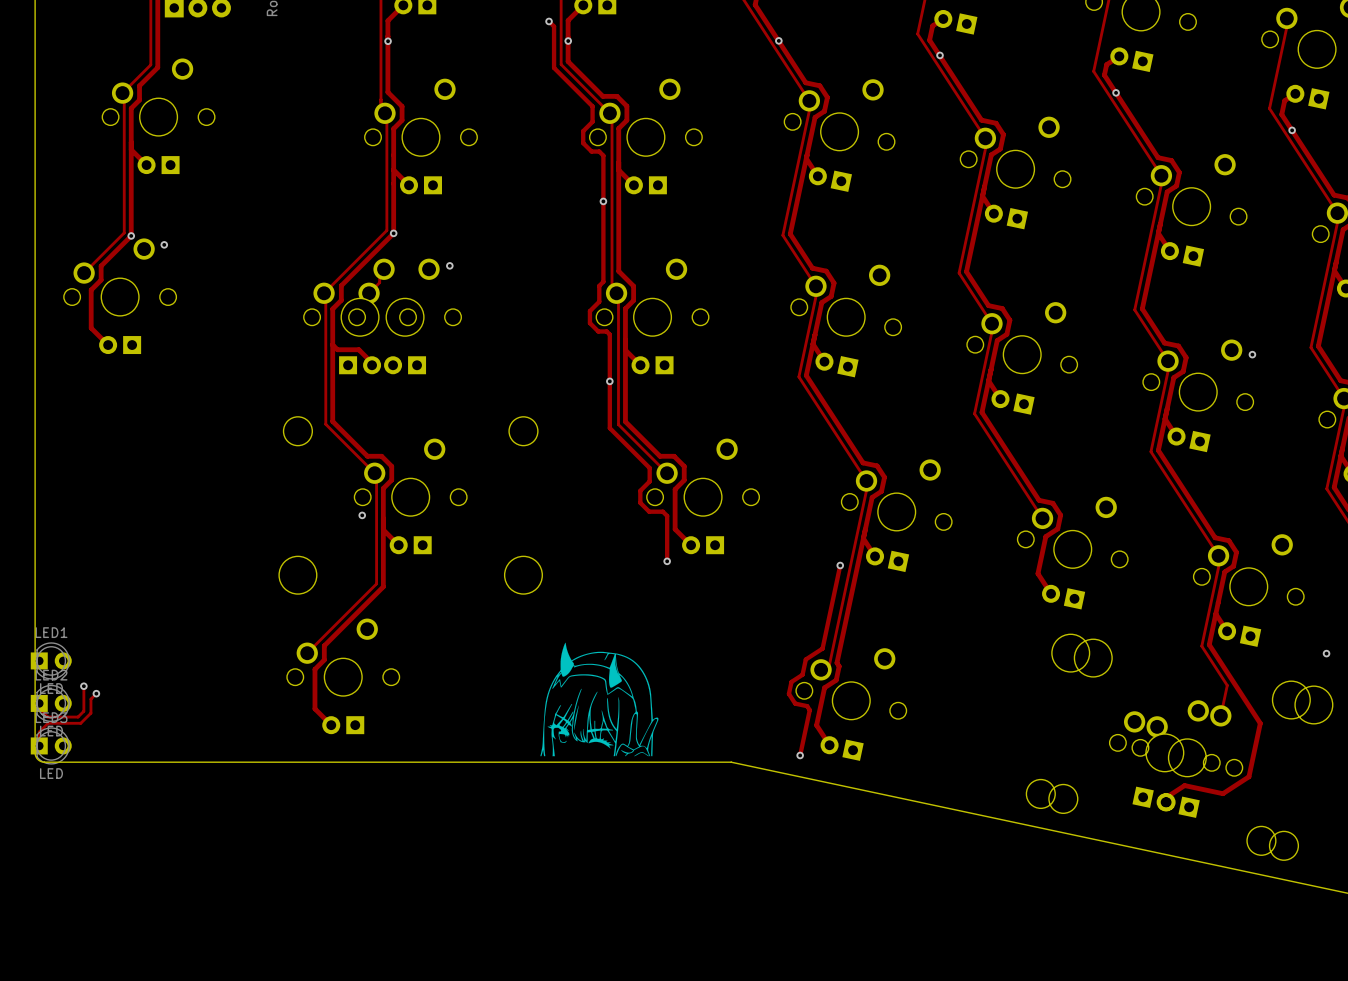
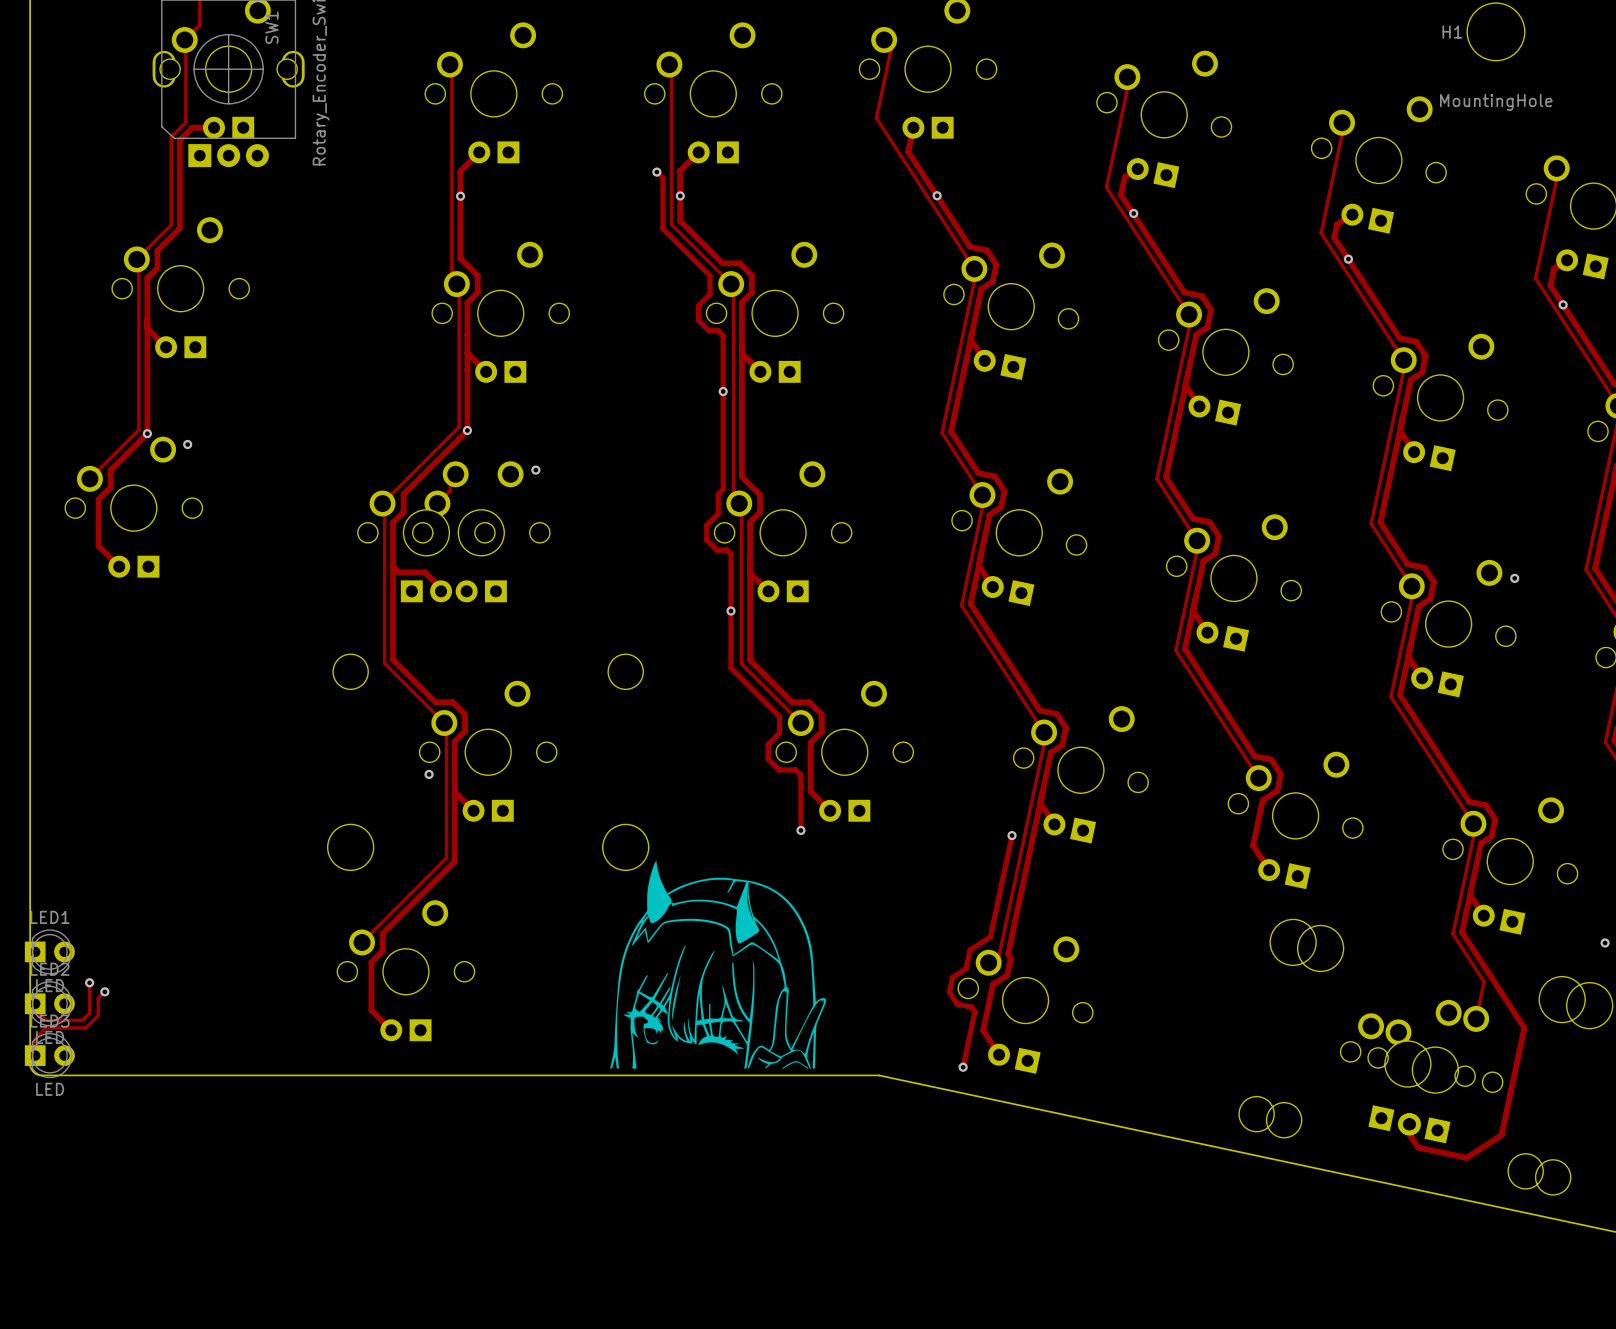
drawing: none -> [610, 860, 826, 1069]
drawing: [540, 642, 659, 757] -> none
track: (1248, 776) (1222, 793) (1184, 785) (1166, 797) (1166, 802) -> (1510, 1093) (1501, 1135) (1466, 1157) (1418, 1147) (1407, 1131) (1410, 1124)

